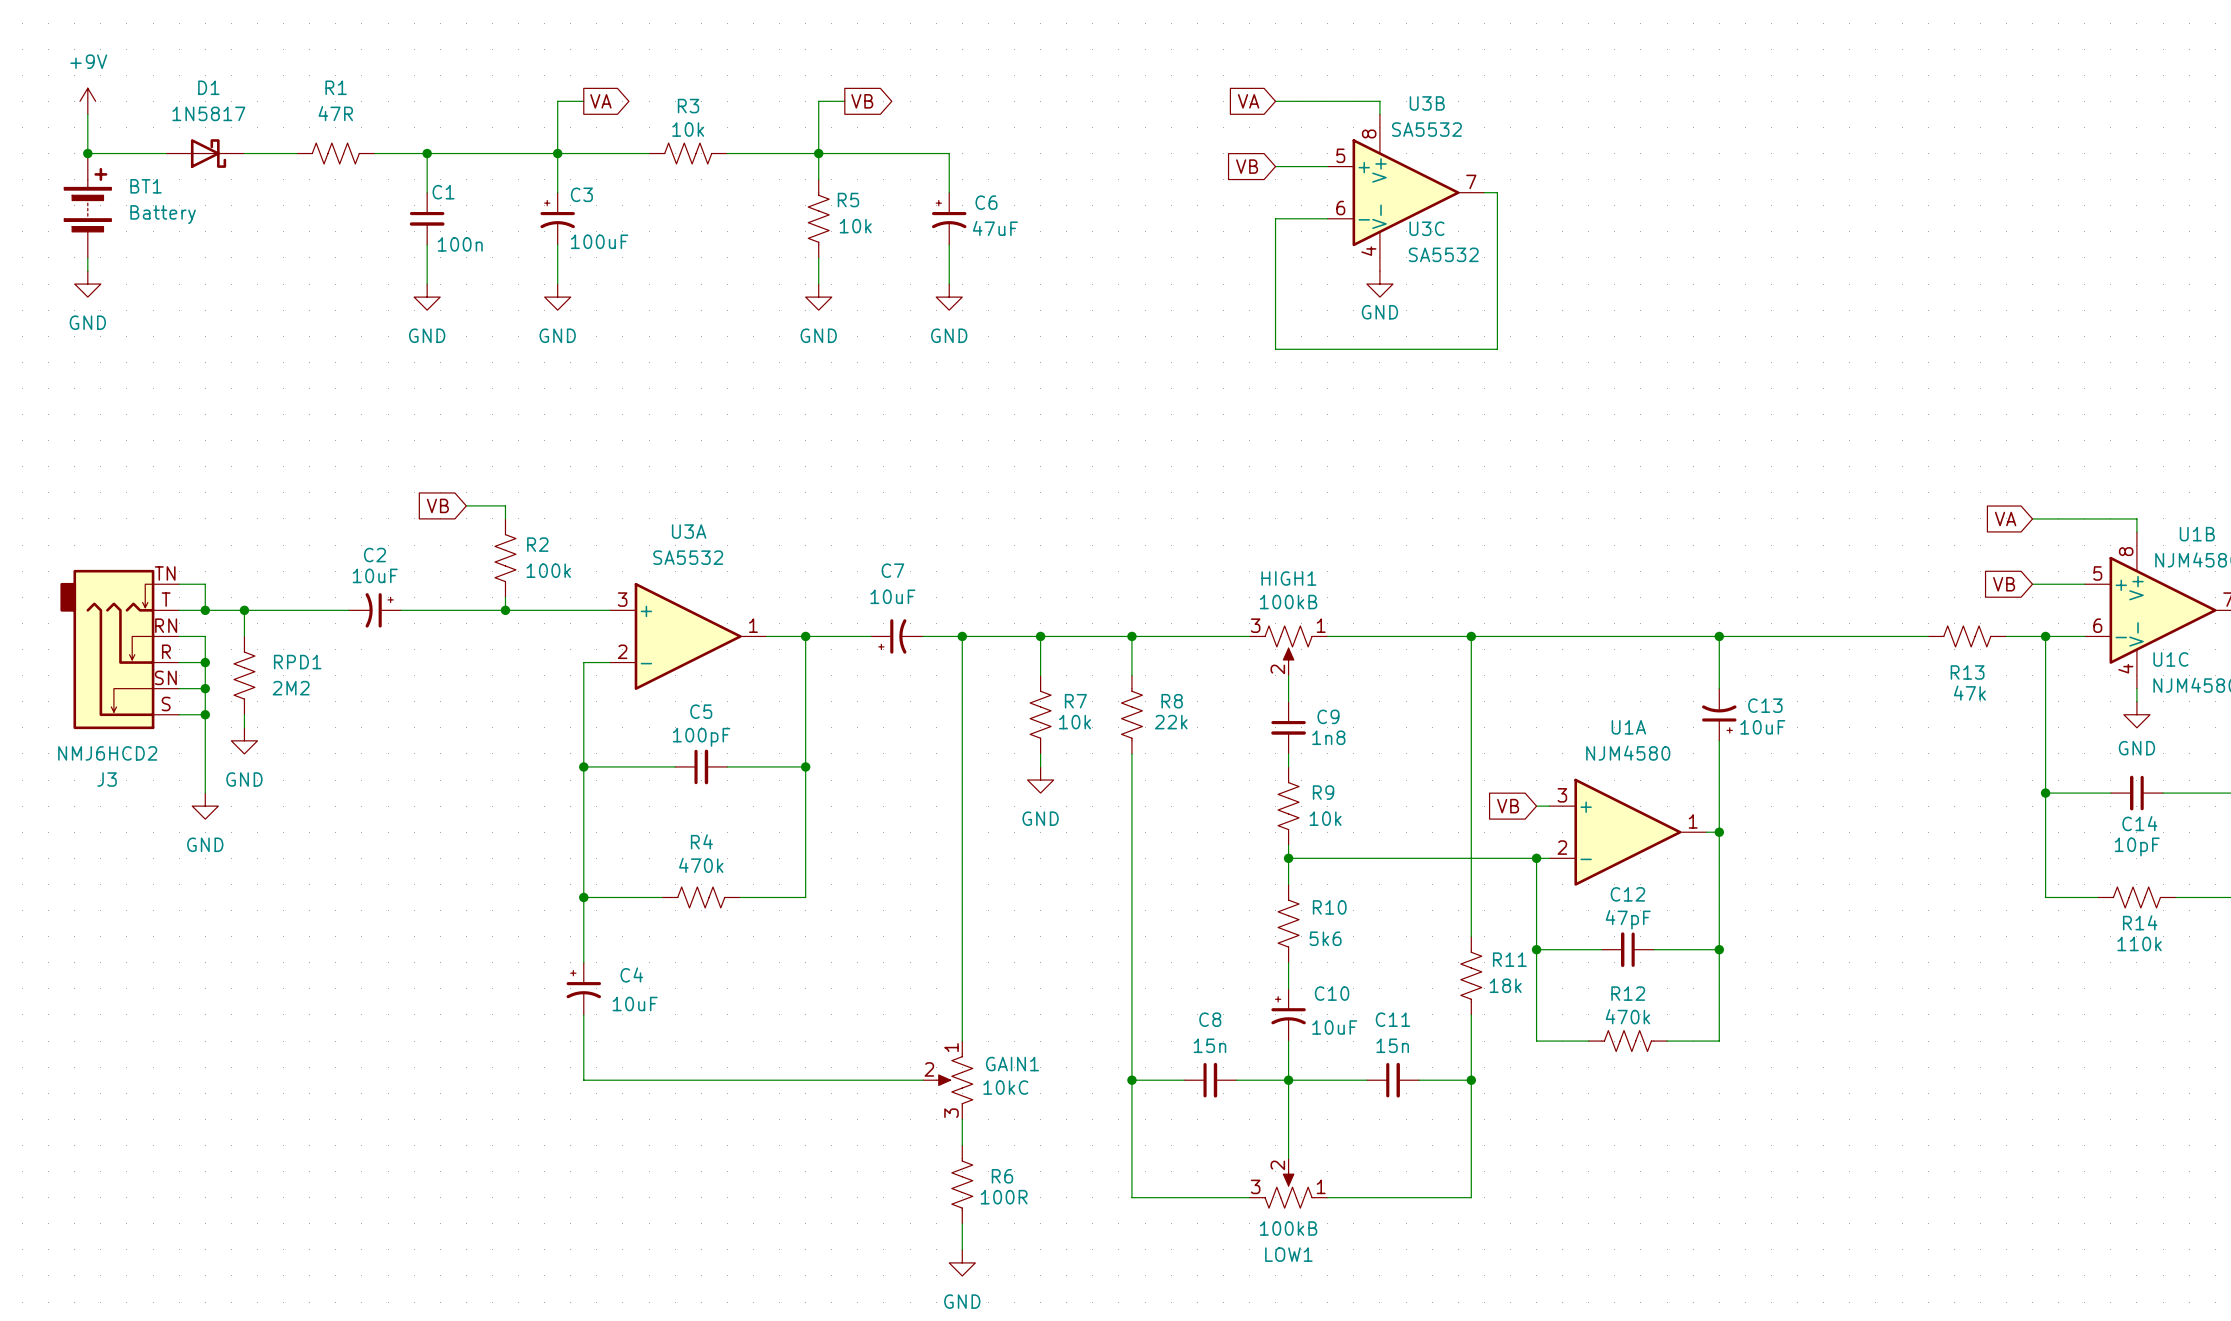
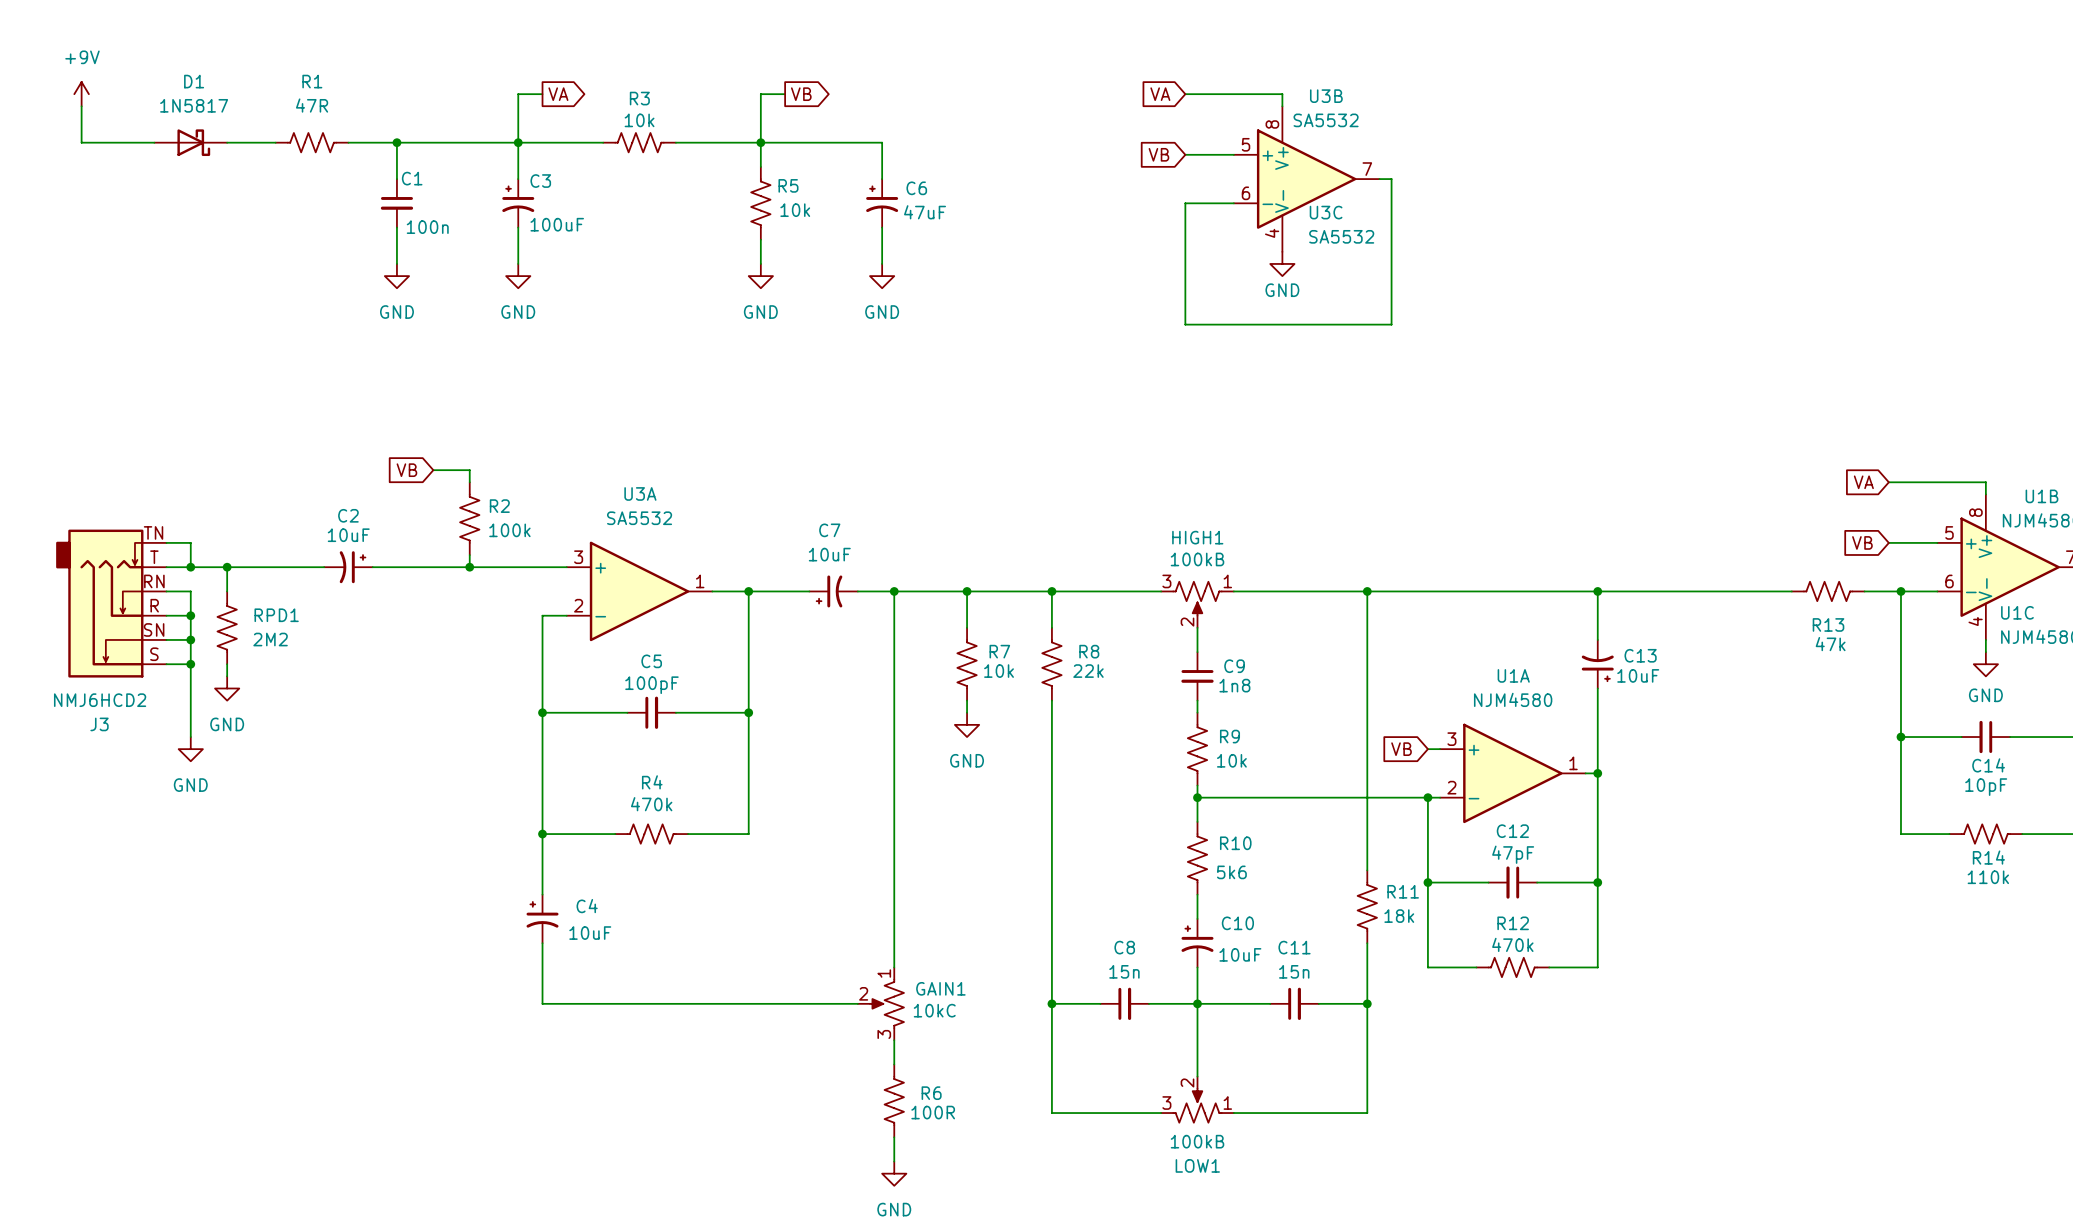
junction: (87, 153) -> none
BT1: Battery (87, 205) -> none
wire: (87, 257) (87, 271) -> none
power symbol: GND (87, 284) -> none

